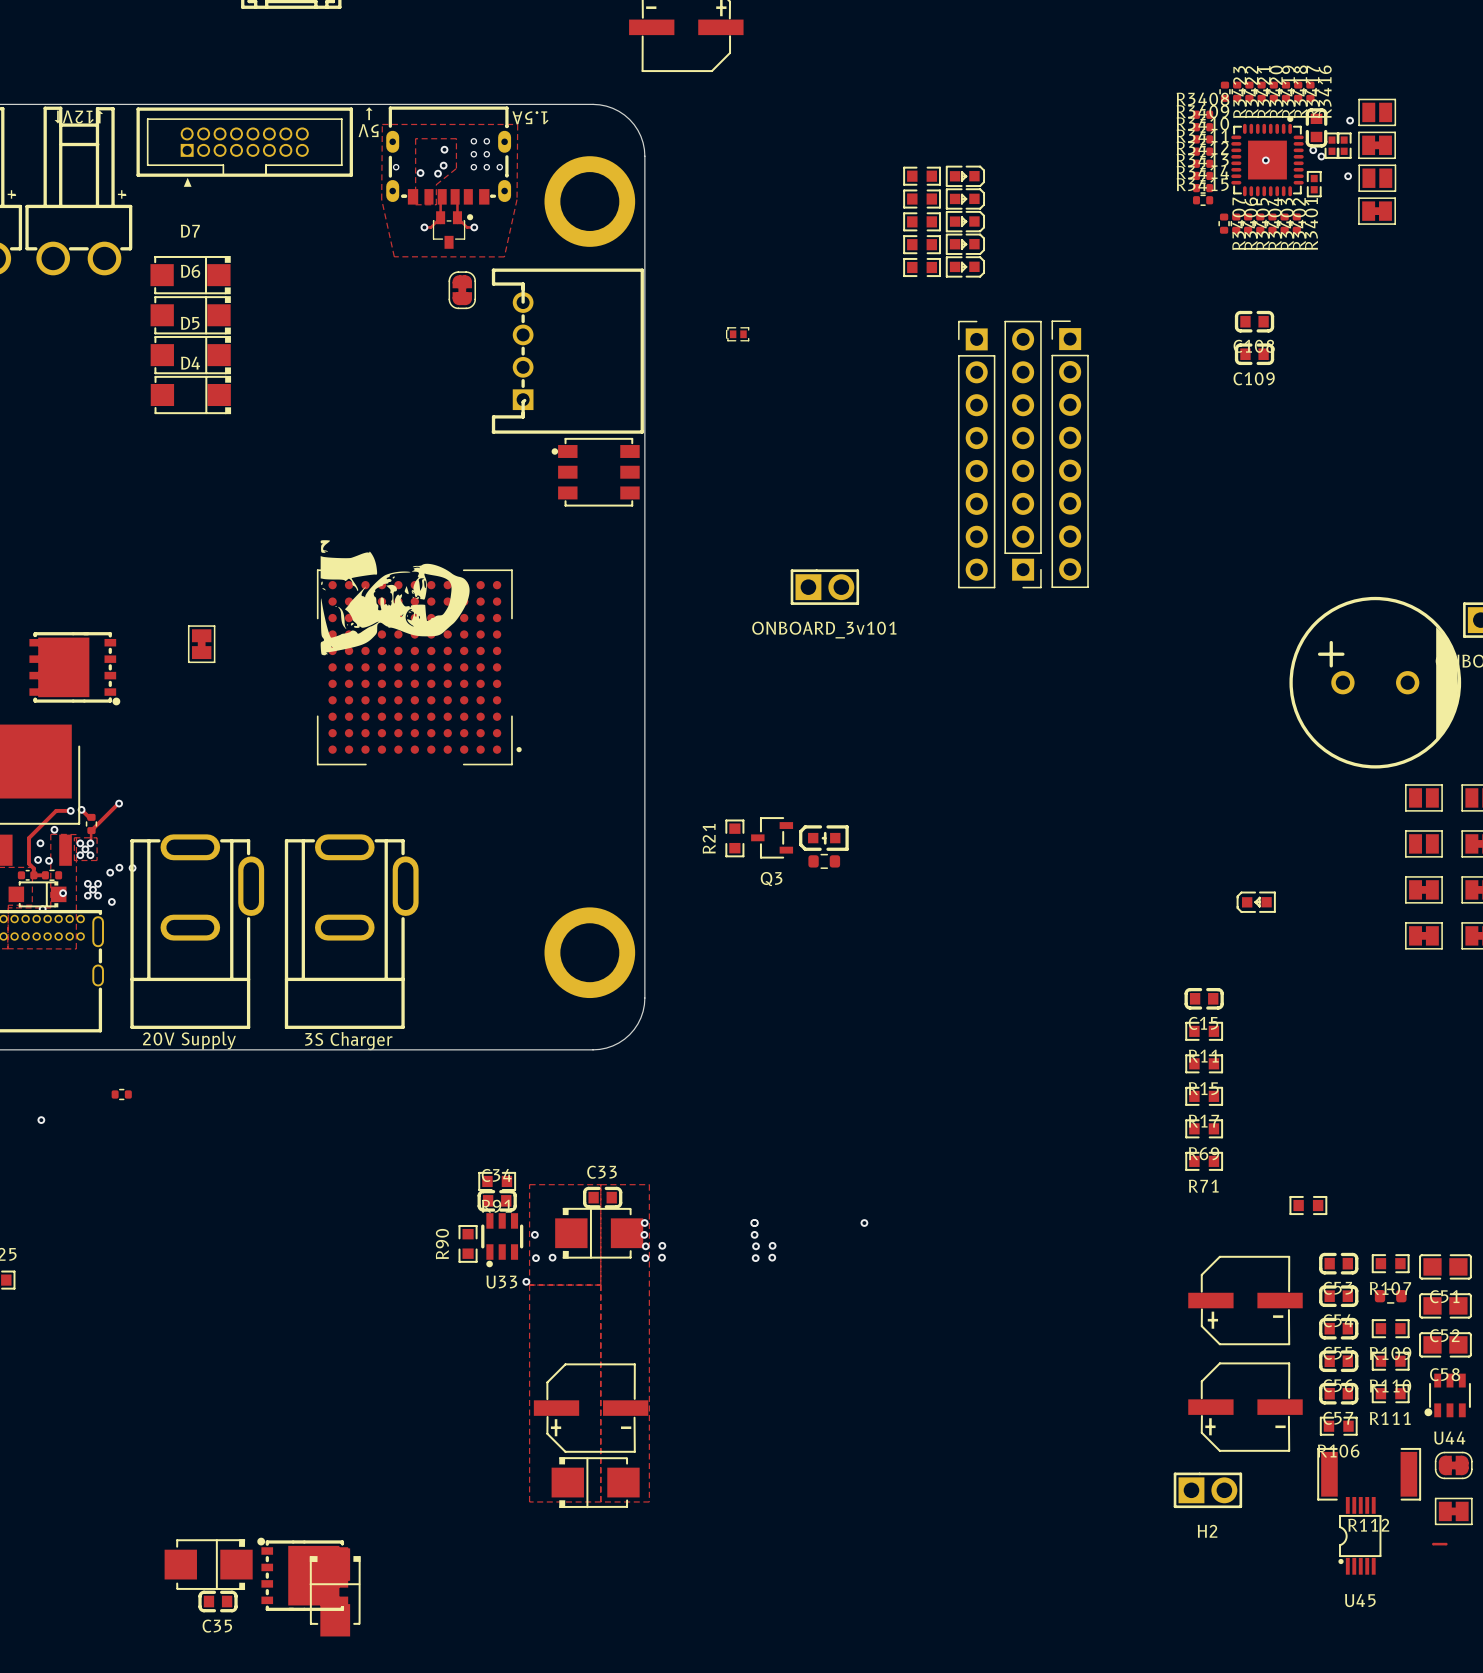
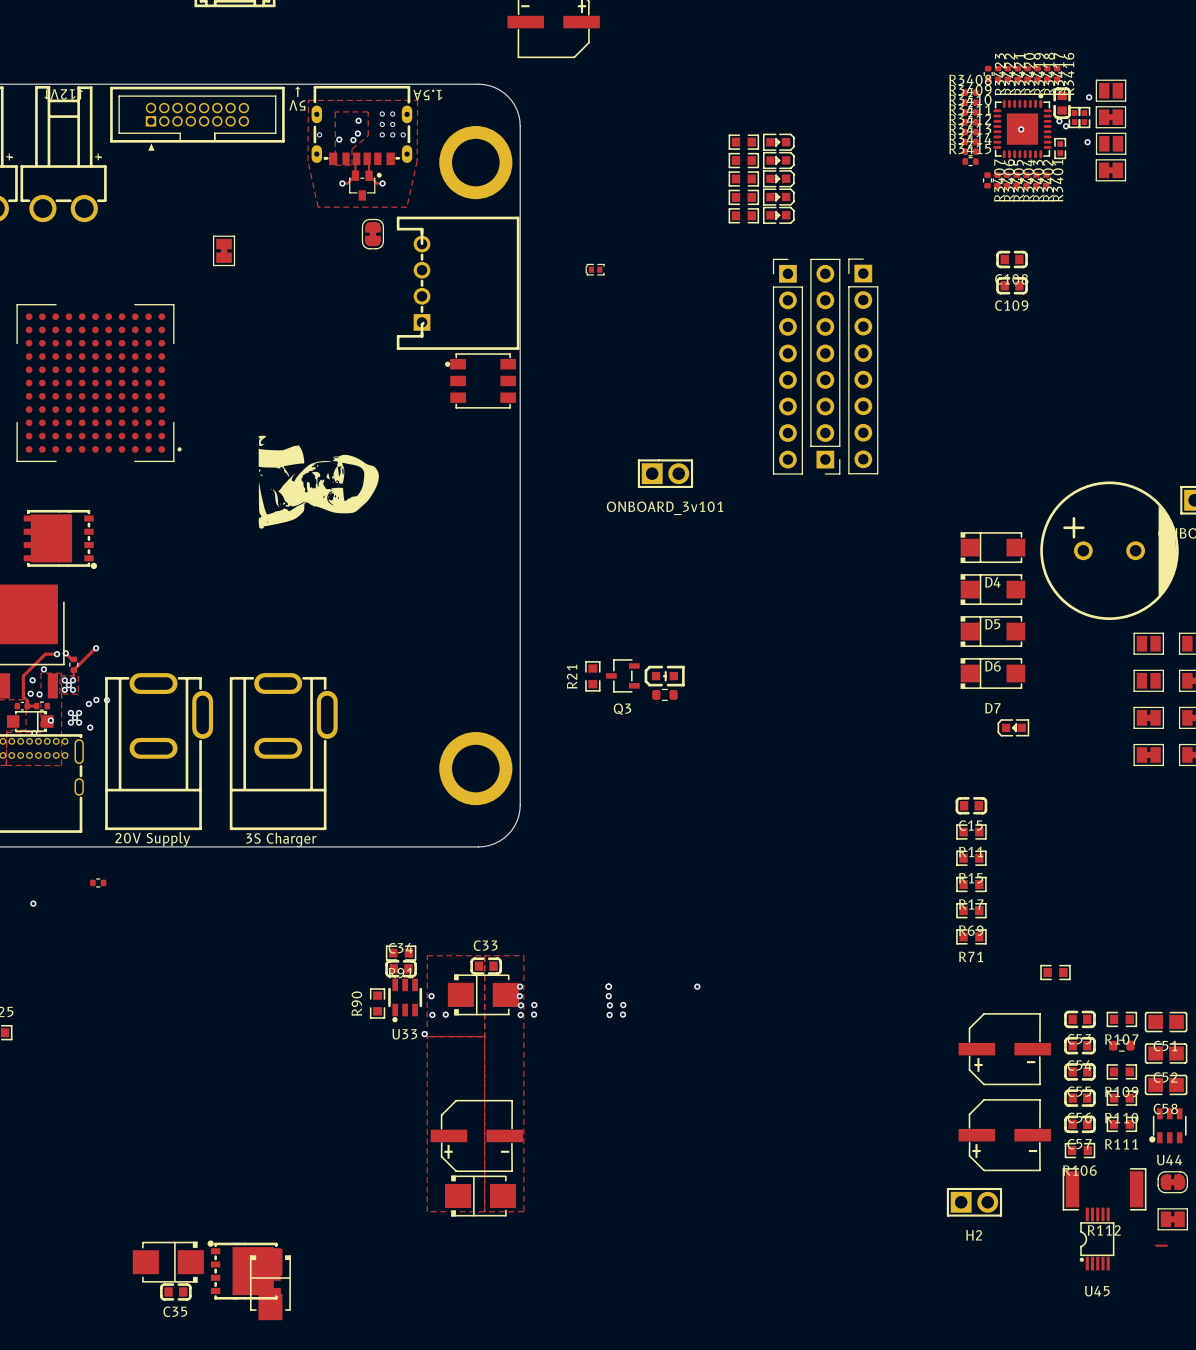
D7 rotation: 0° (190, 275) -> 180° (992, 673)
D7 position: (190, 275) -> (992, 673)
part: none -> (224, 250)
D6 rotation: 0° (190, 315) -> 180° (992, 631)
D6 position: (190, 315) -> (992, 631)
D5 rotation: 0° (190, 355) -> 180° (992, 589)
D5 position: (190, 355) -> (992, 589)
D4 rotation: 0° (190, 395) -> 180° (992, 547)
D4 position: (190, 395) -> (992, 547)
part: none -> (99, 383)
part: (201, 644) -> none
part: (419, 667) -> none

